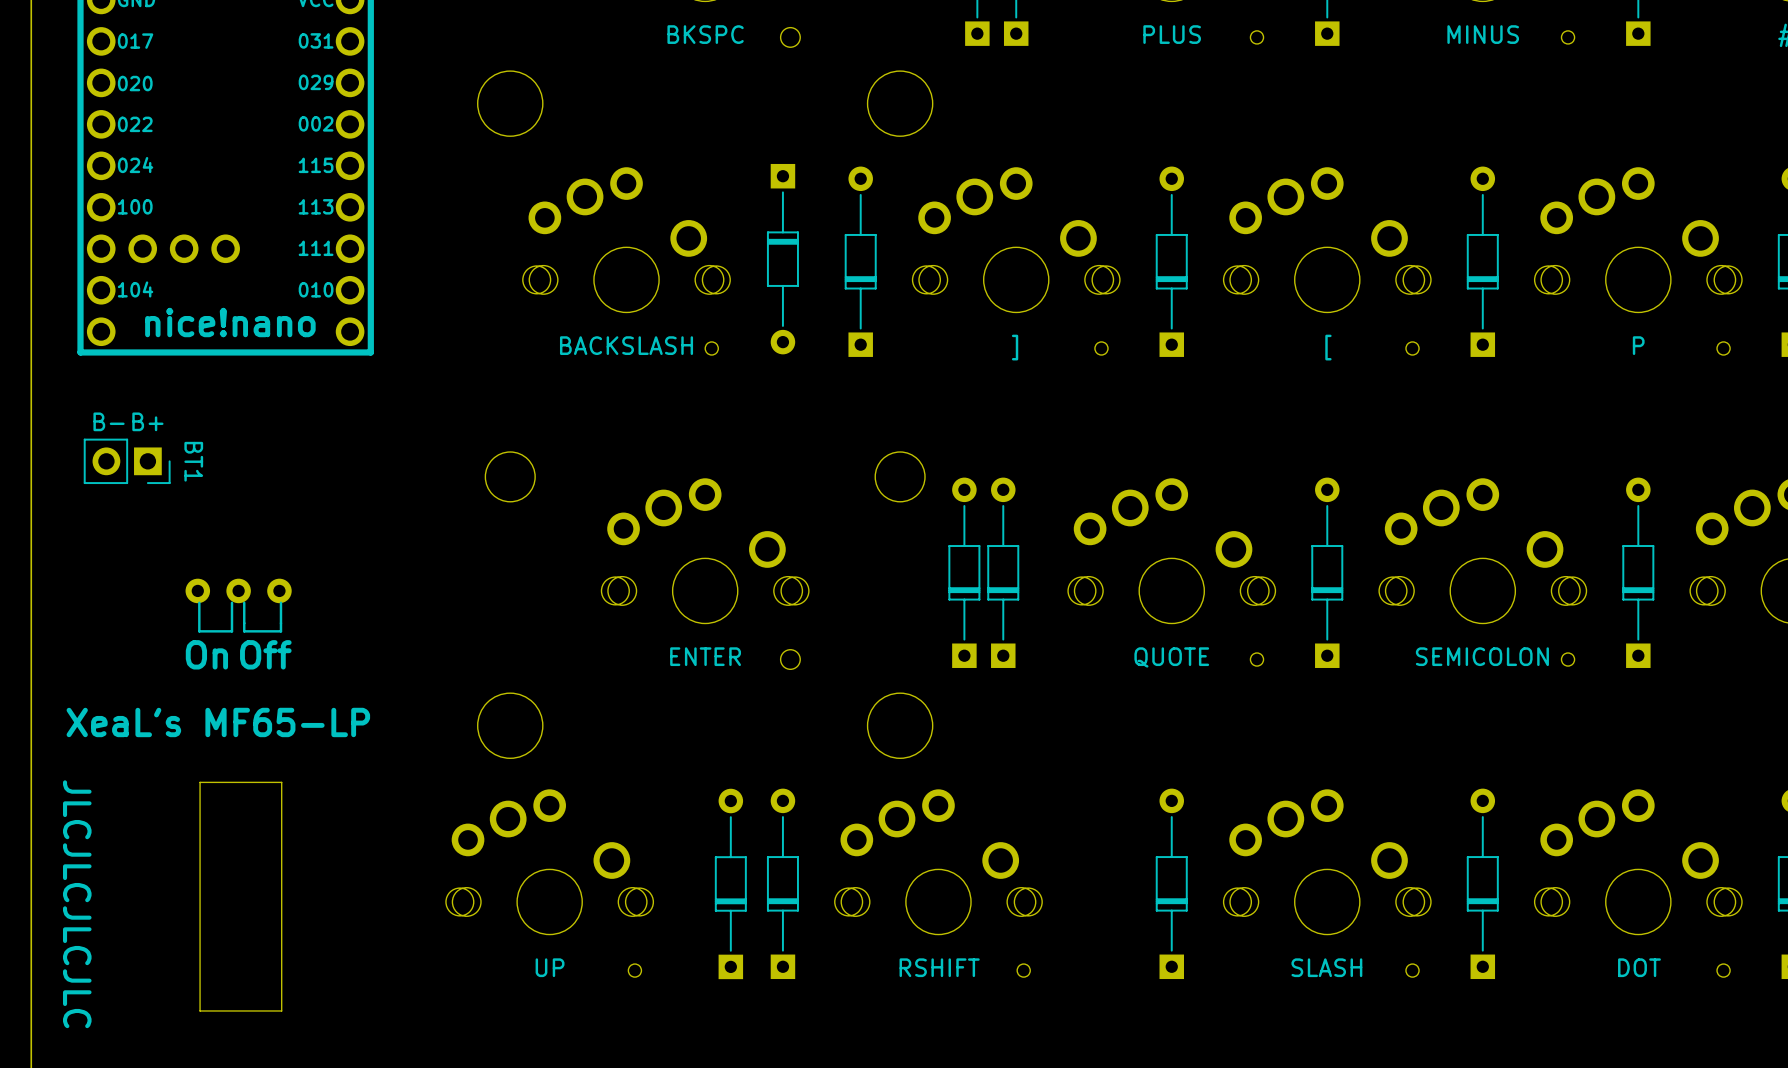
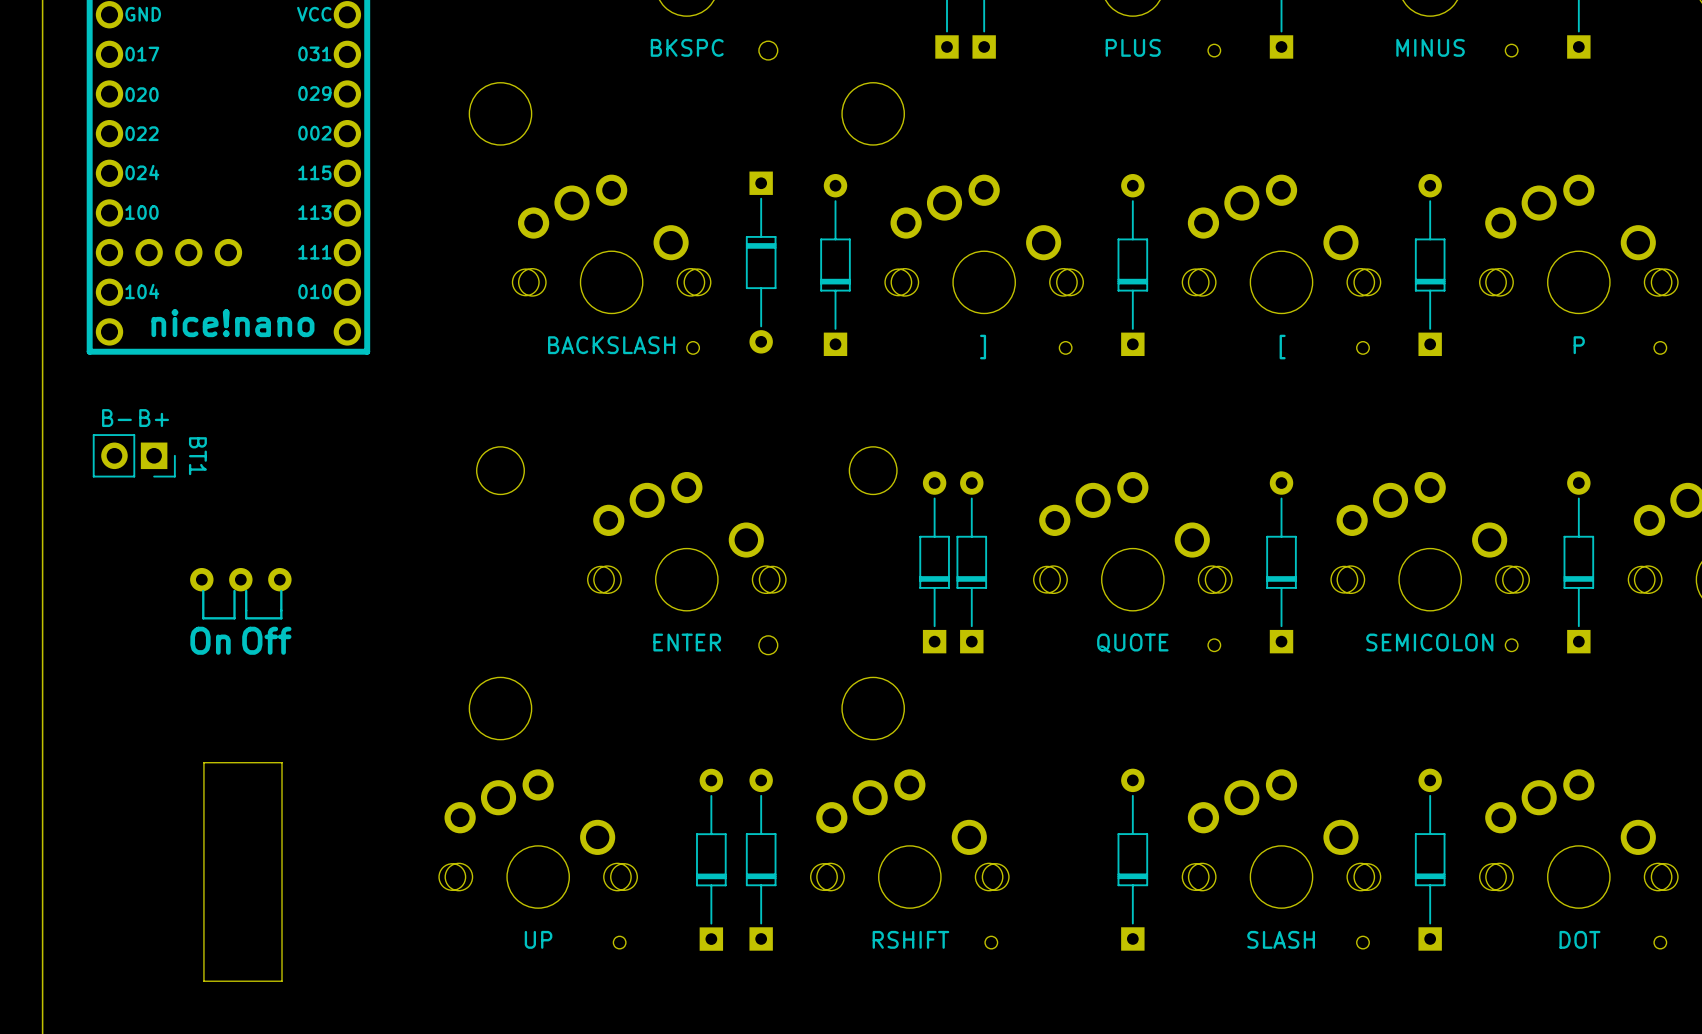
text: XeaL's MF65-LP (218, 722) -> none
text: JLCJLCJLCJLC (77, 904) -> none

